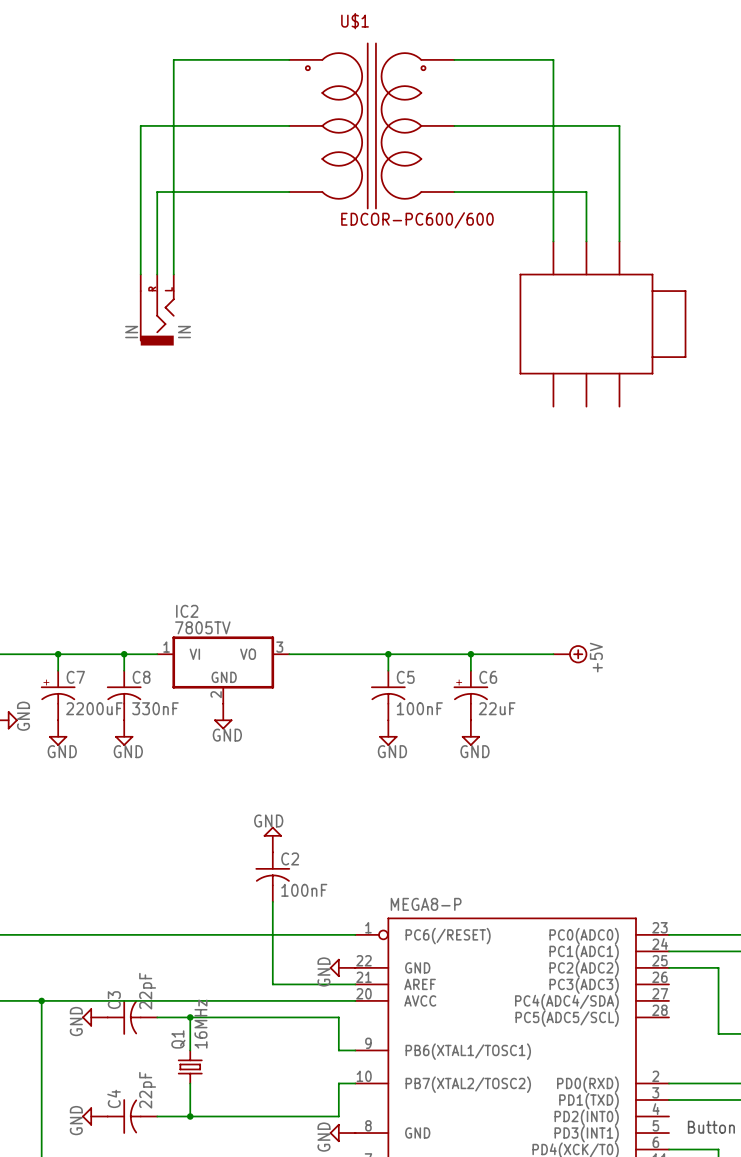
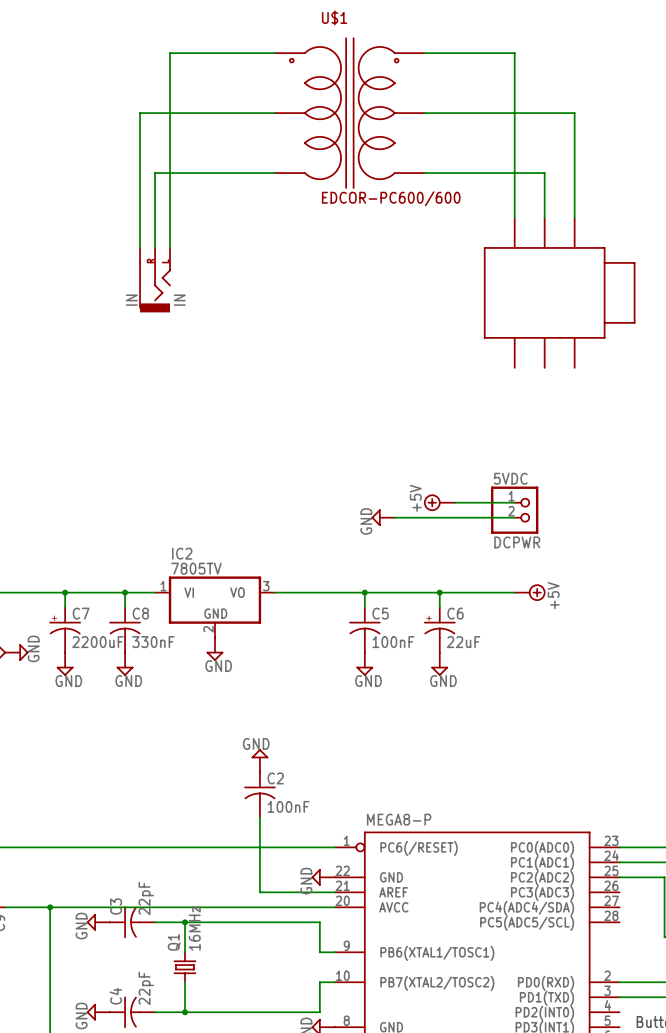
power symbol: none -> +5V (439, 502)
wire: none -> (454, 502) (514, 502)
5VDC: none -> DCPWR (514, 510)
power symbol: none -> GND (383, 517)
wire: none -> (394, 517) (514, 517)

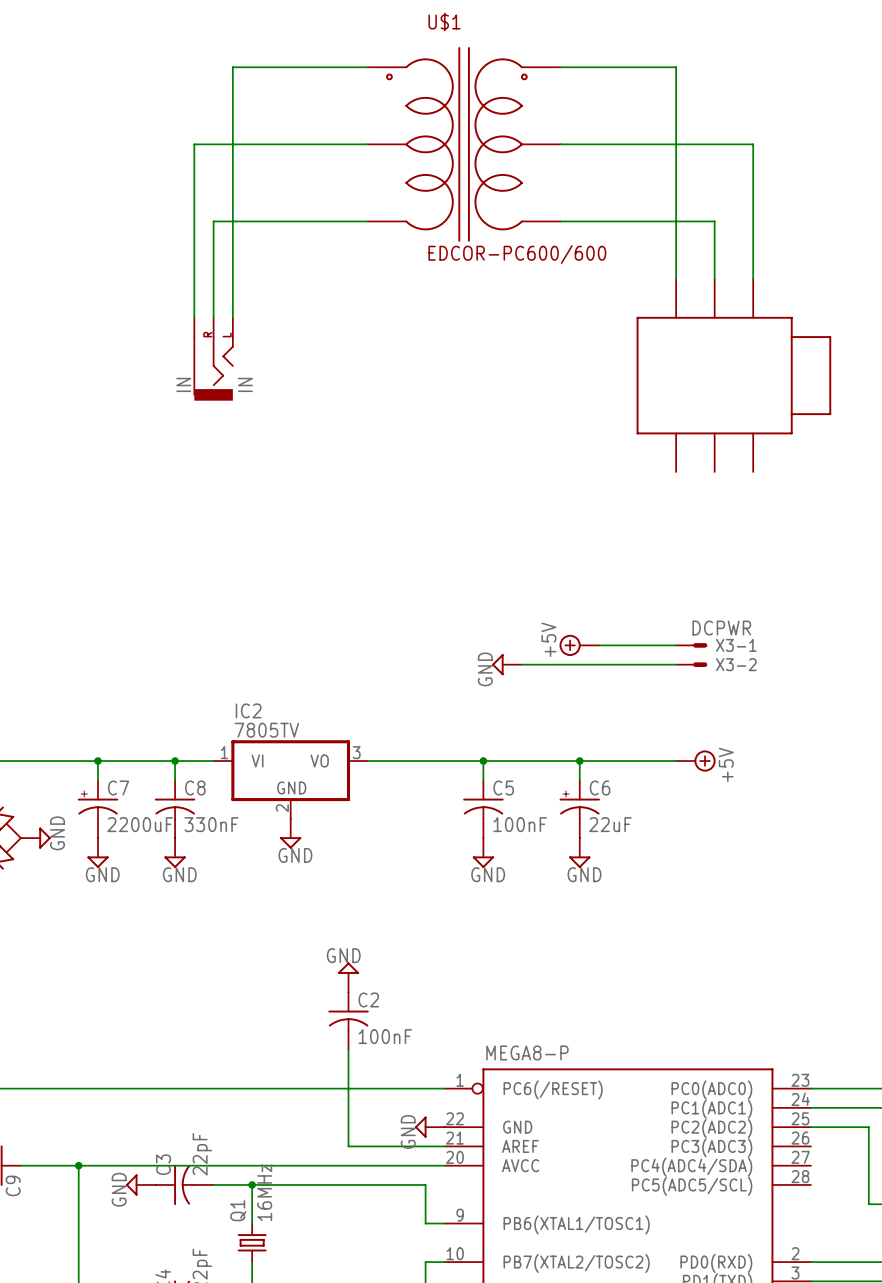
X3-1: none -> DCPWR (691, 645)
5VDC: DCPWR (514, 510) -> none
X3-2: none -> (691, 664)

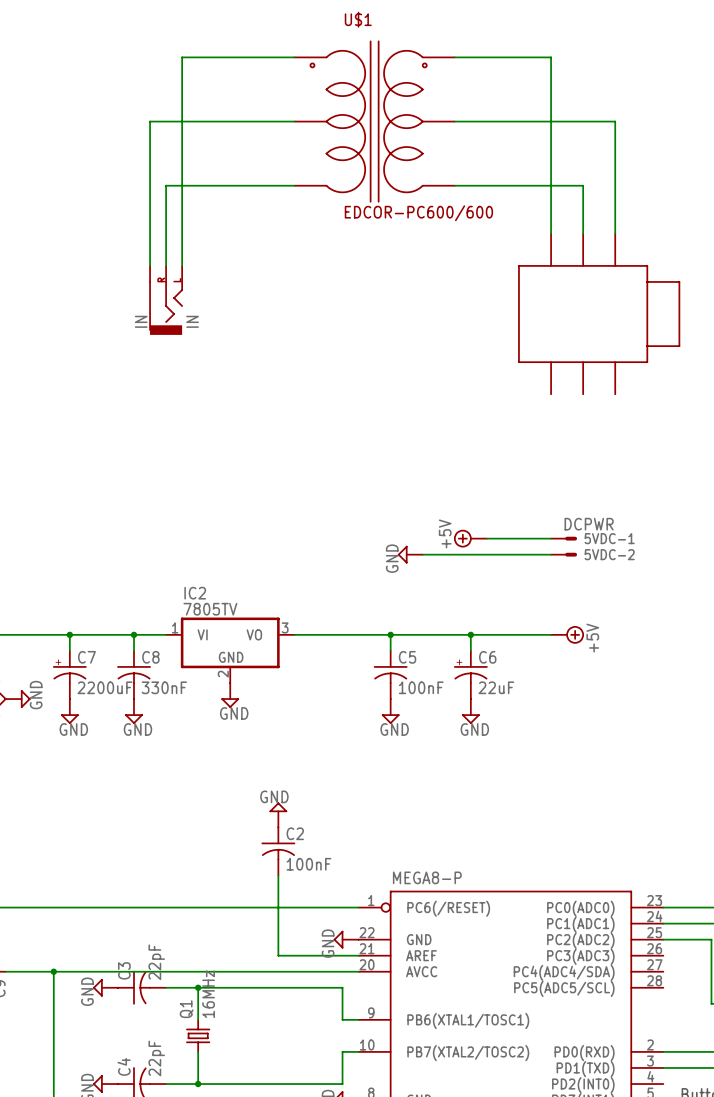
X3-1 name: X3-1 (736, 645) -> 5VDC-1 (609, 538)
X3-2 name: X3-2 (736, 664) -> 5VDC-2 (609, 554)

